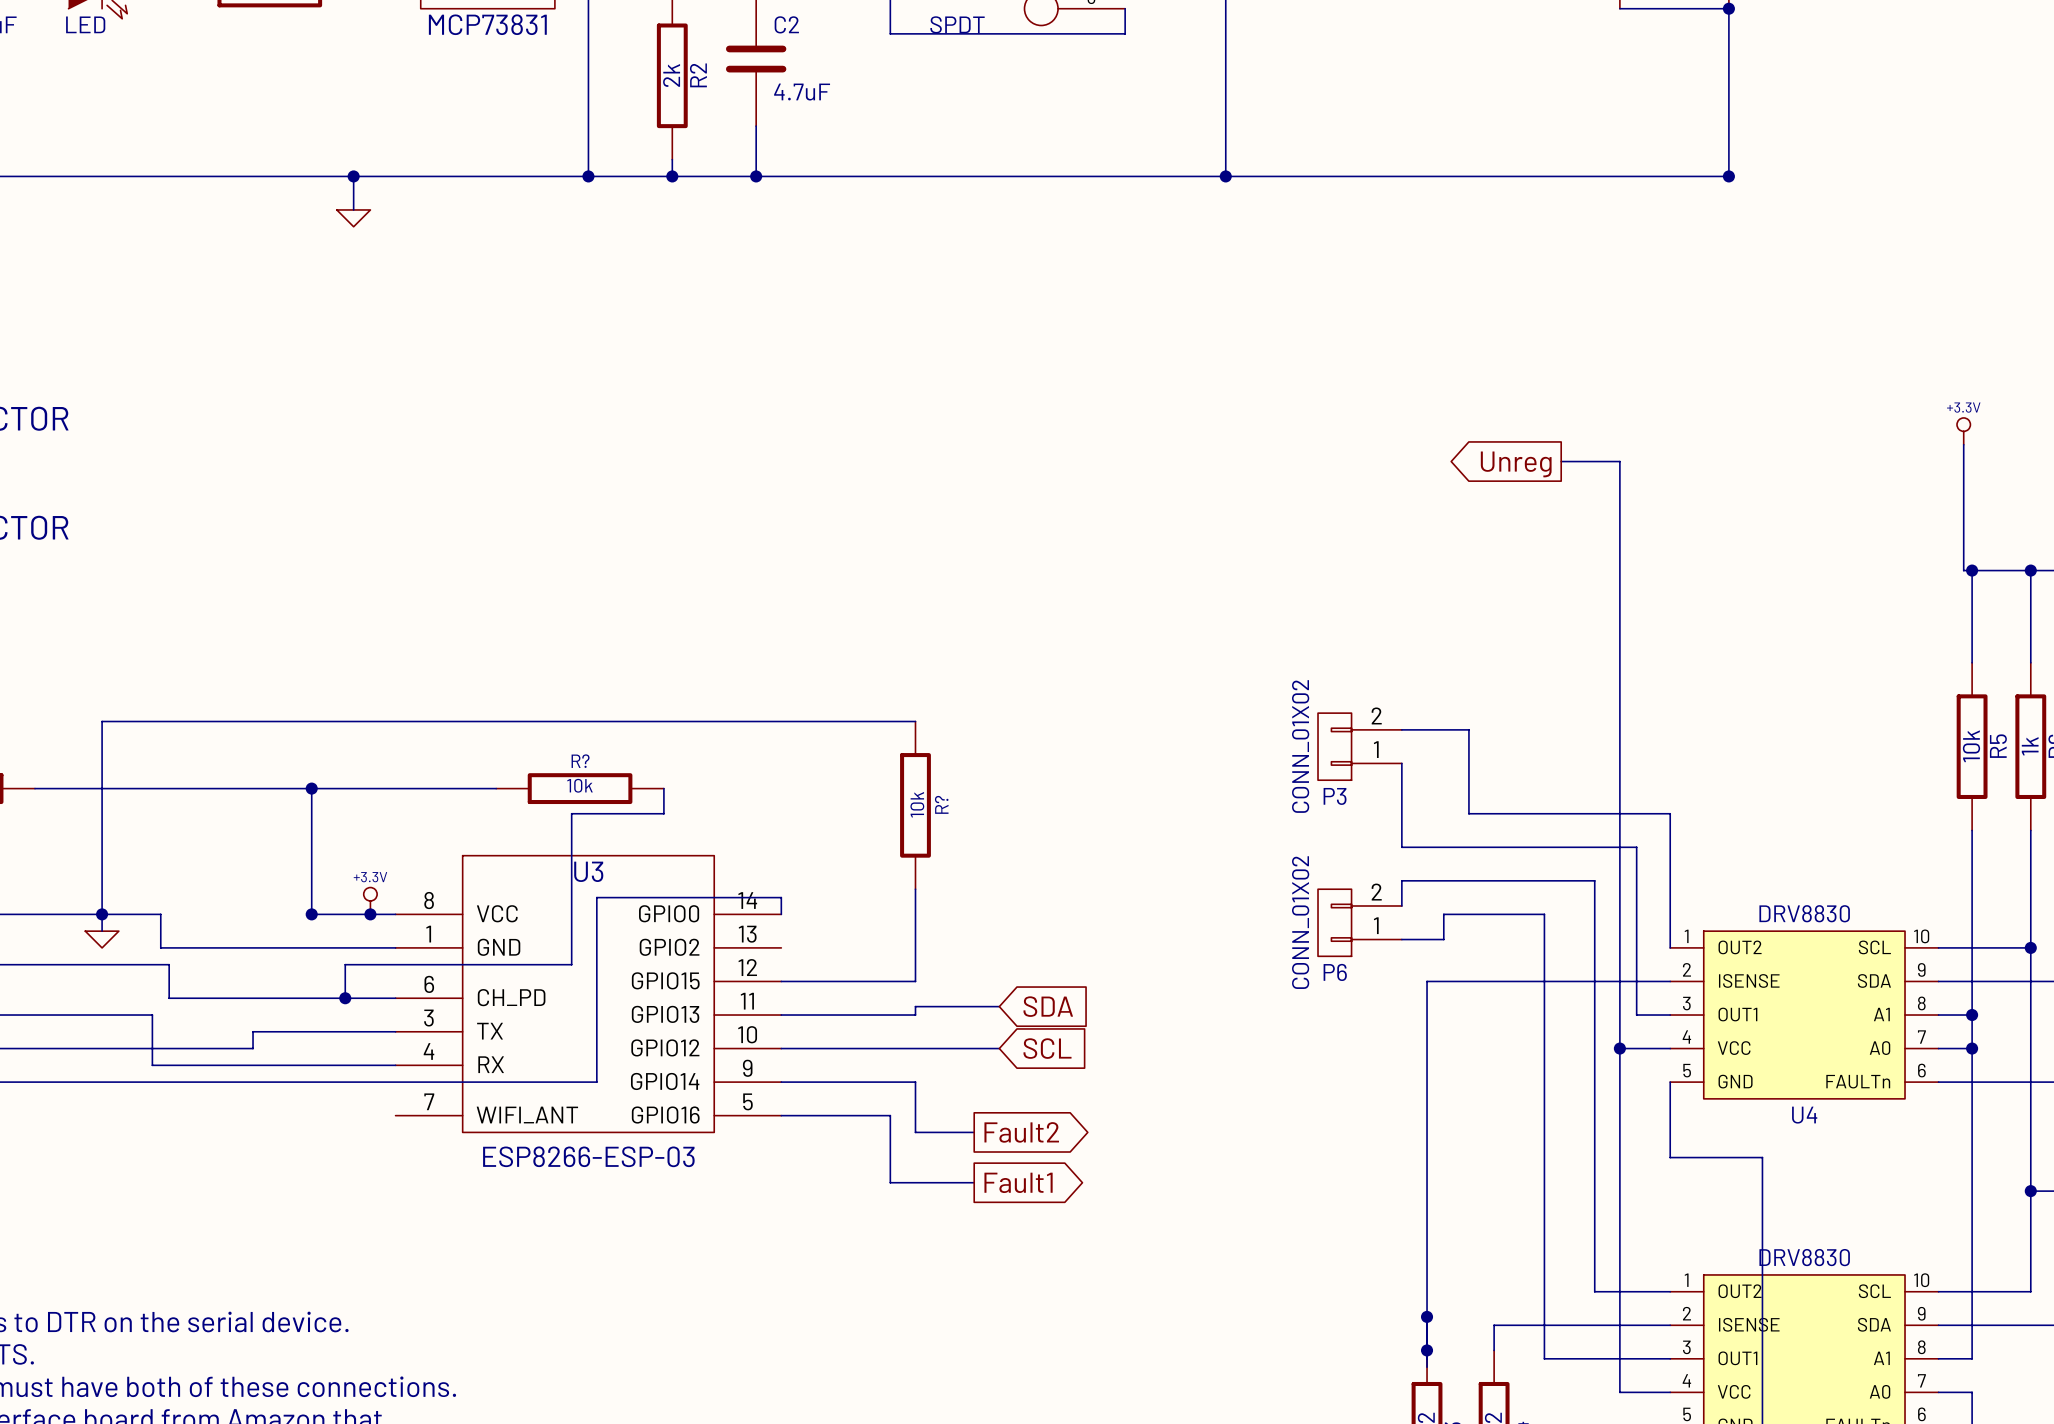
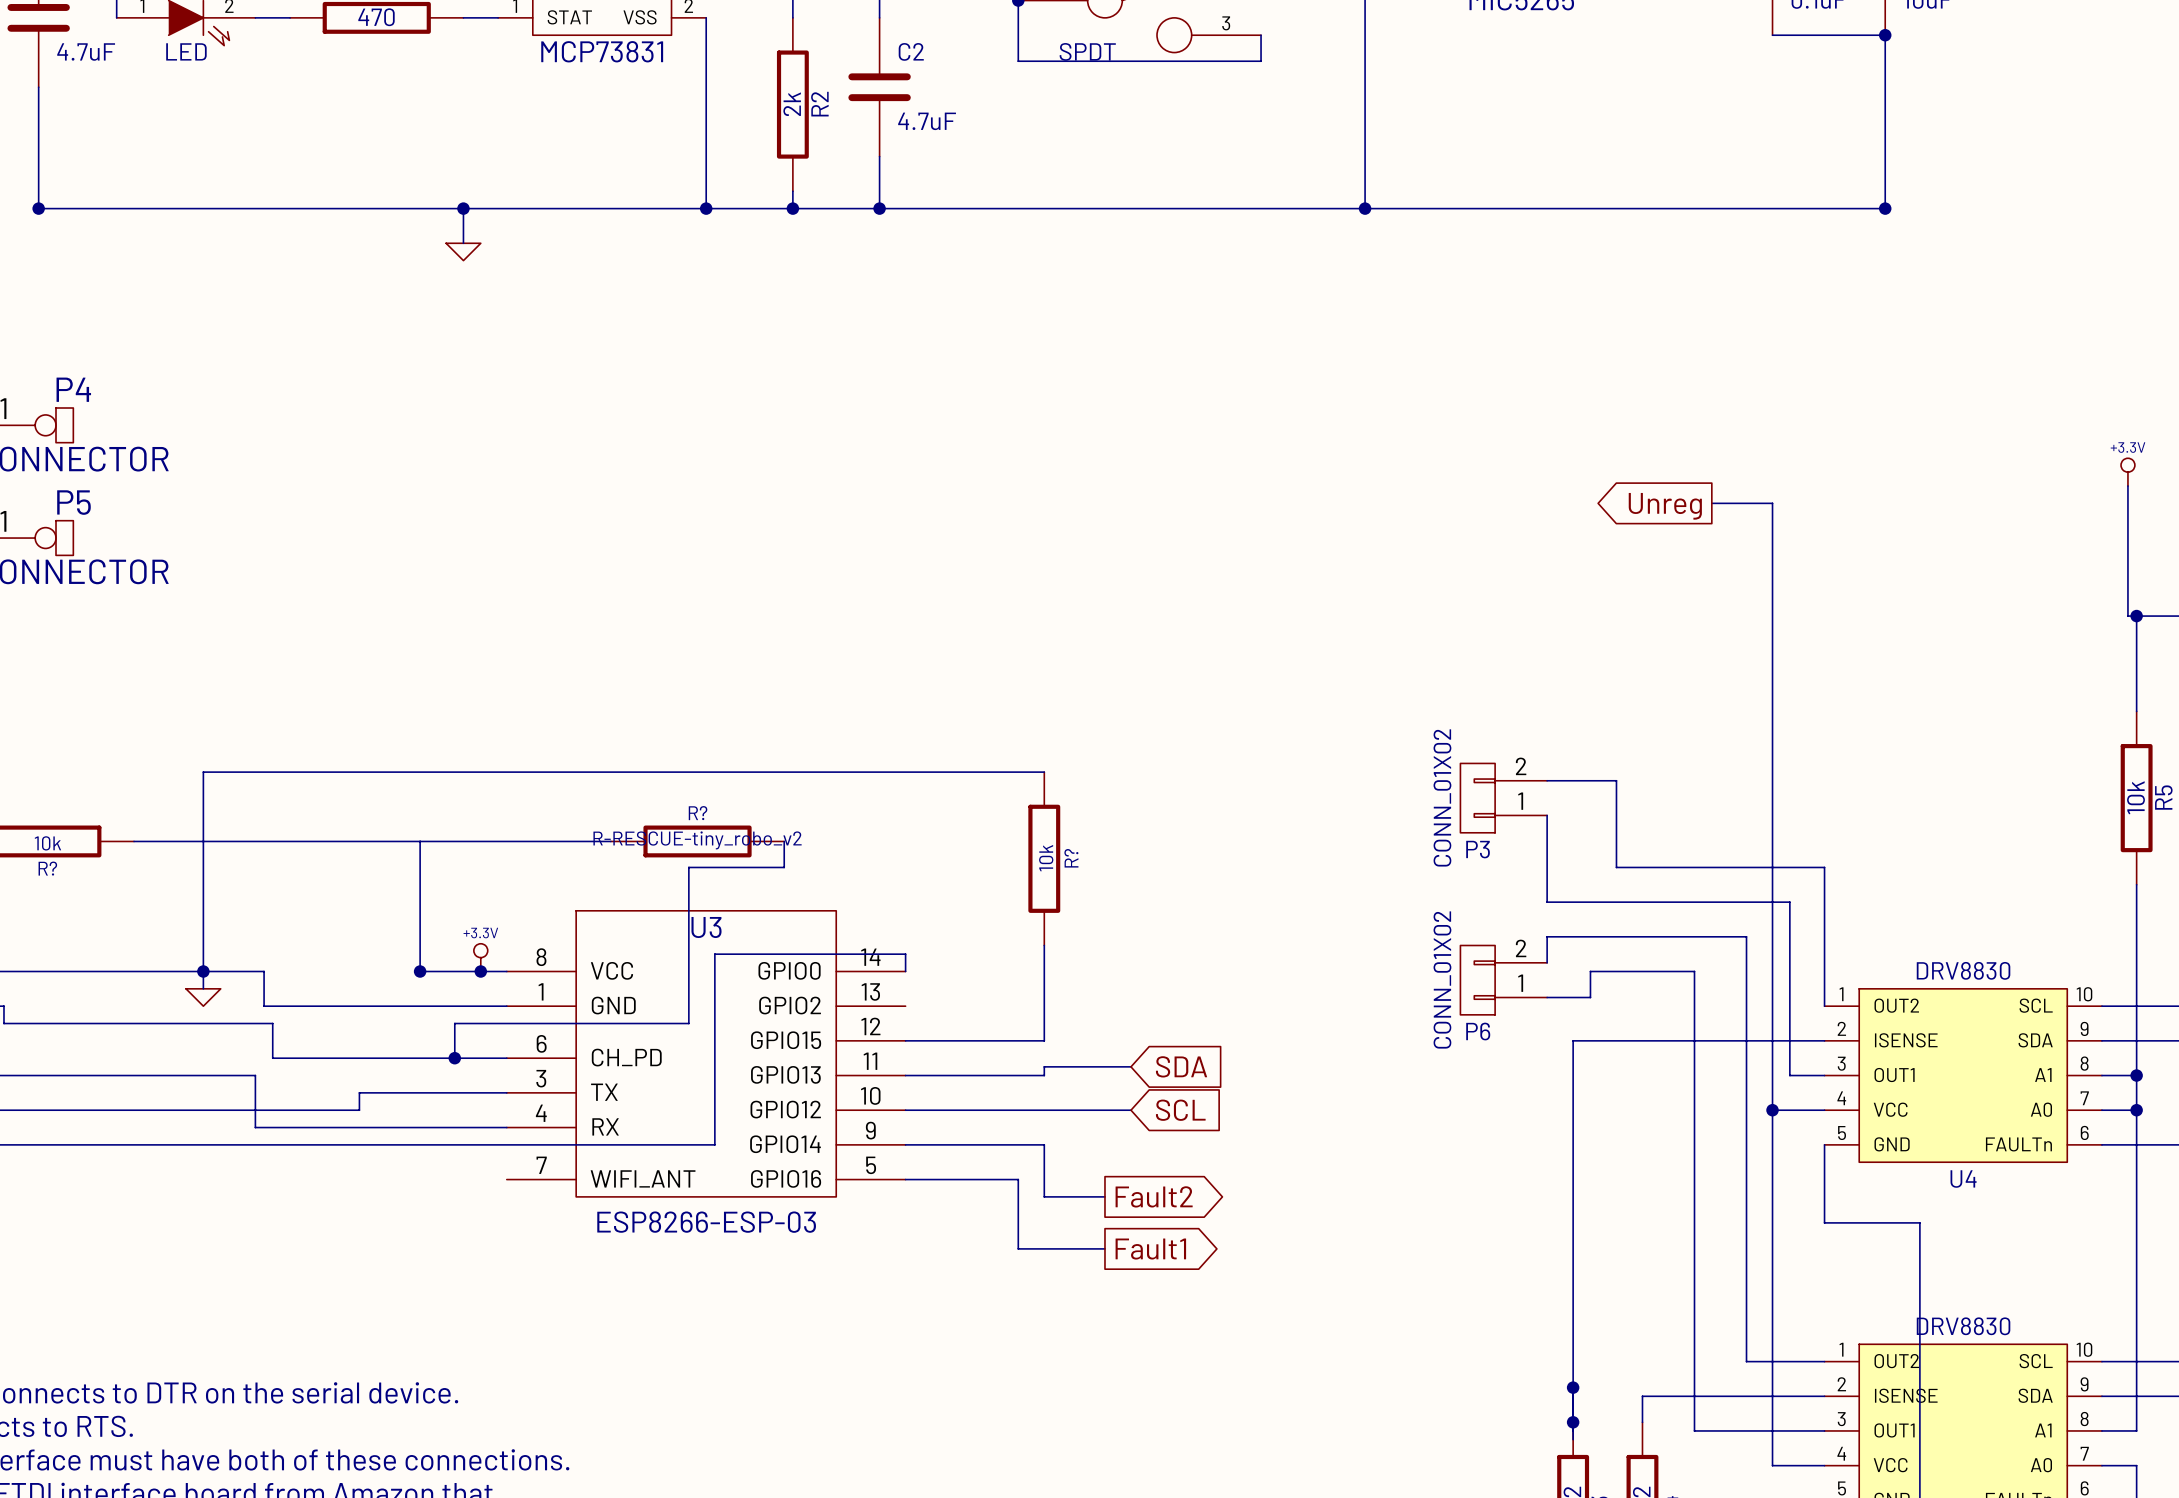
R? value: 10k (579, 785) -> R-RESCUE-tiny_robo_v2 (697, 840)
junction: (311, 788) -> none

